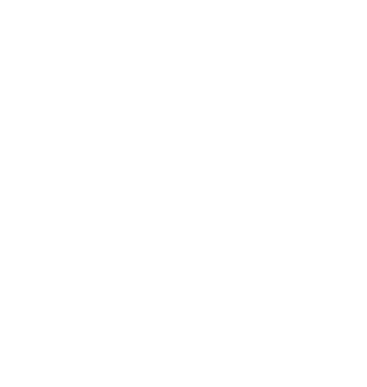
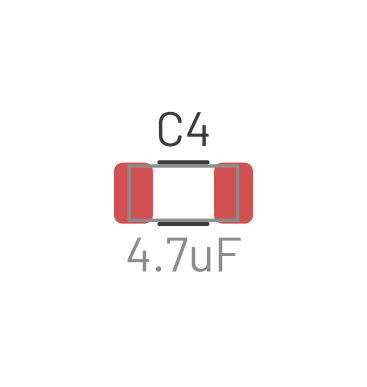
C4: none -> 4.7uF (183, 193)

